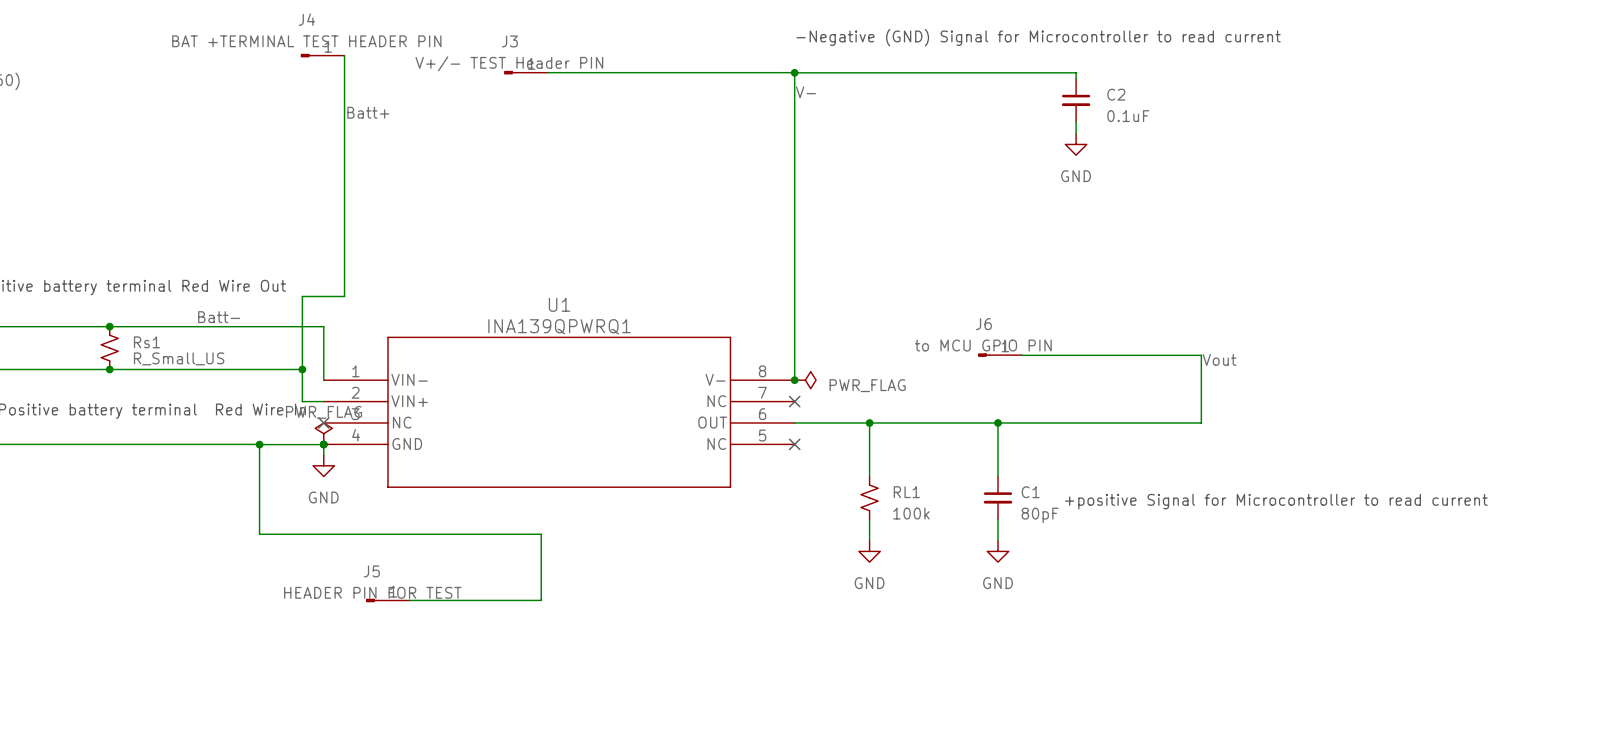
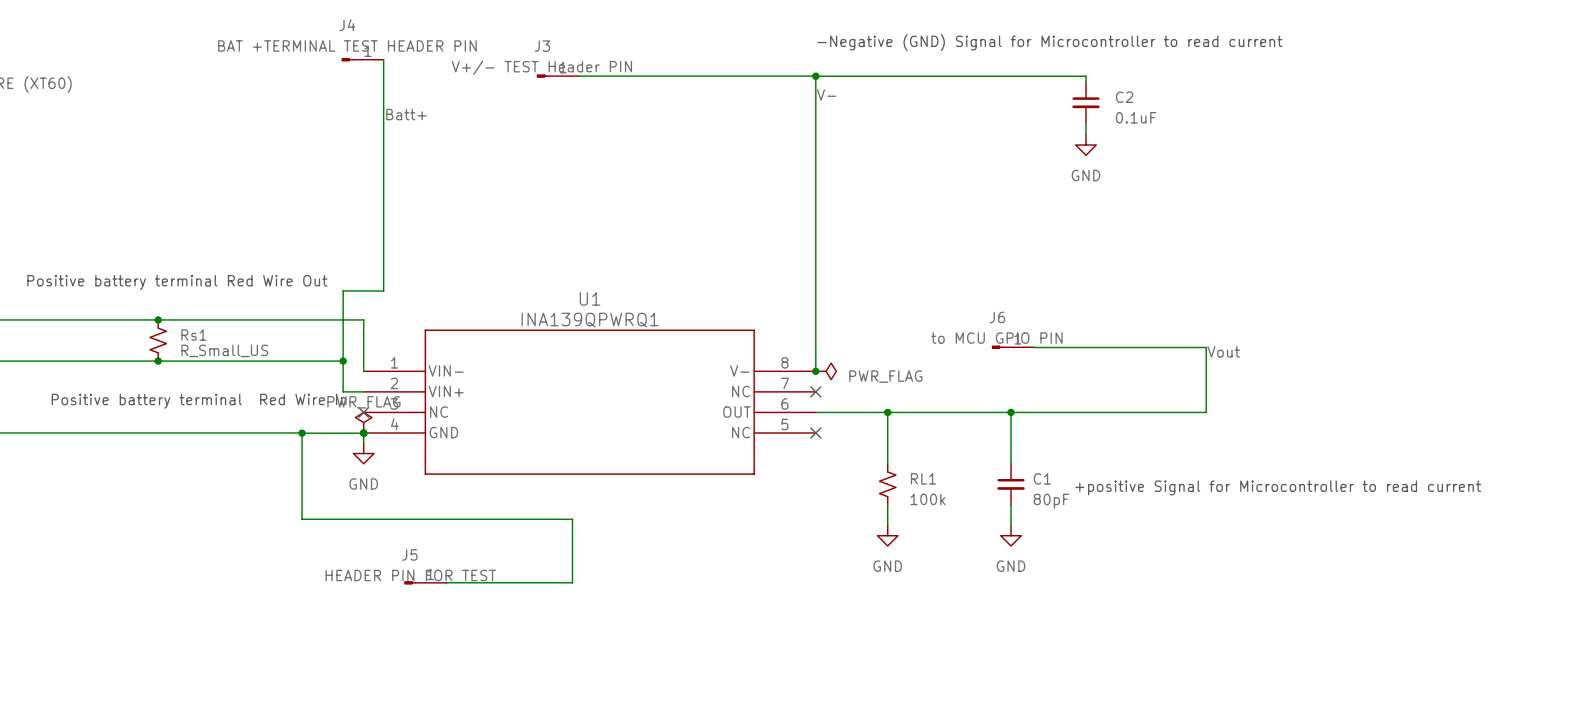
label: Batt- (219, 317) -> none

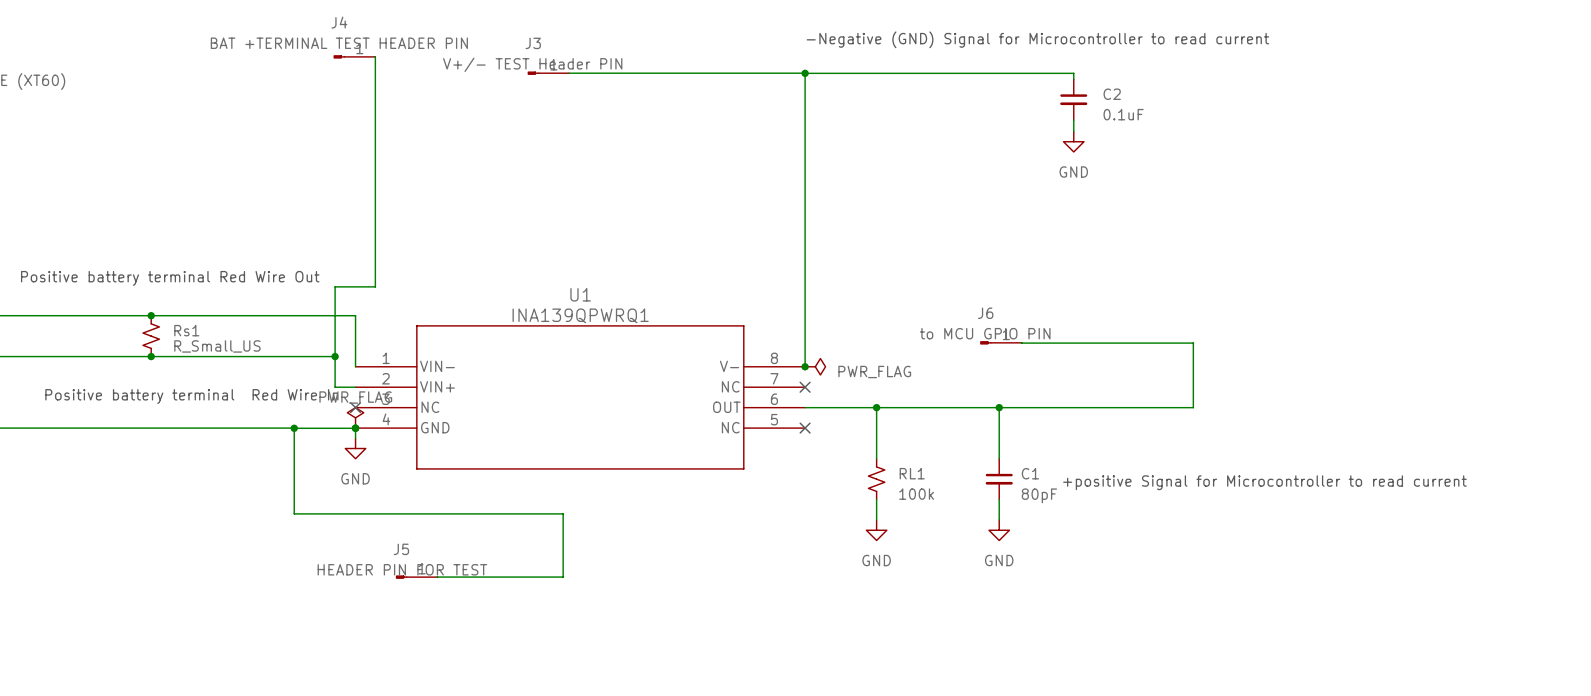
label: V- (826, 95) -> none
label: Batt+ (406, 114) -> none
label: Vout (1223, 351) -> none

